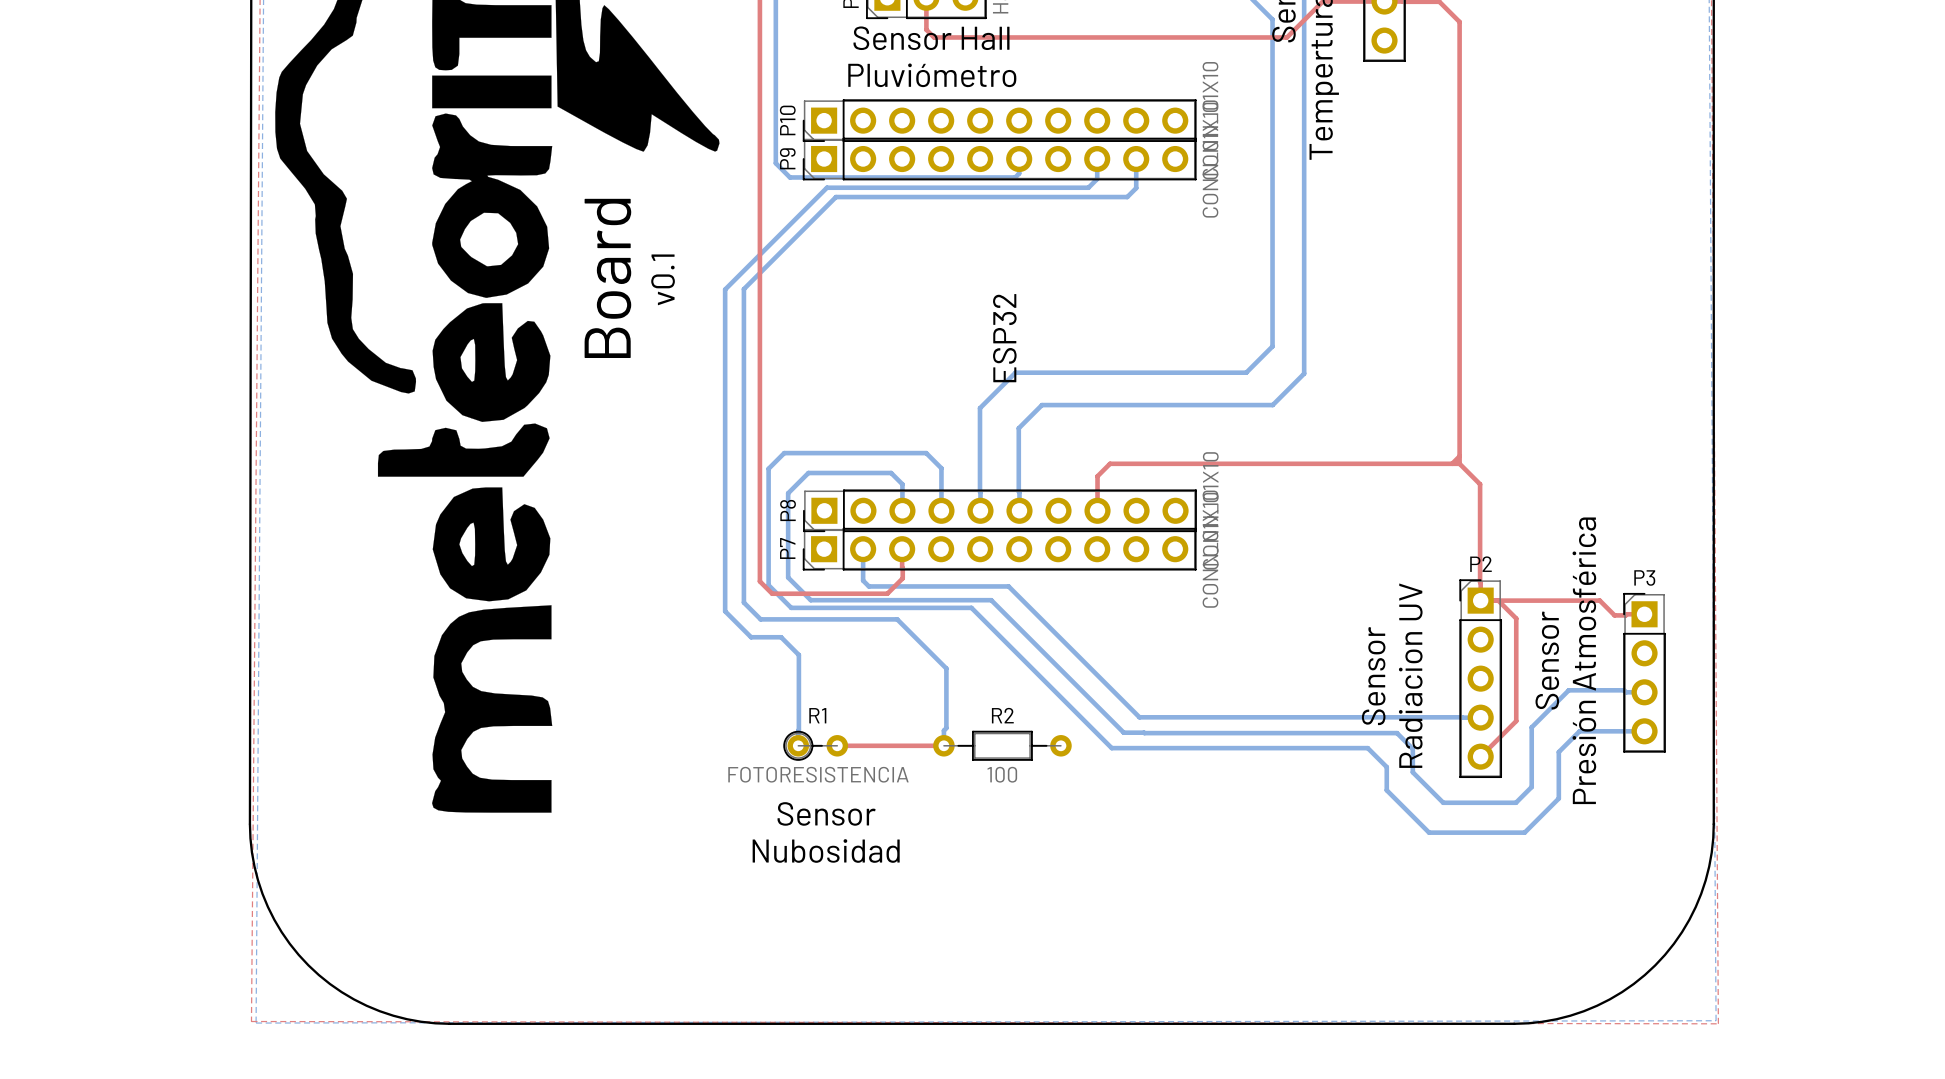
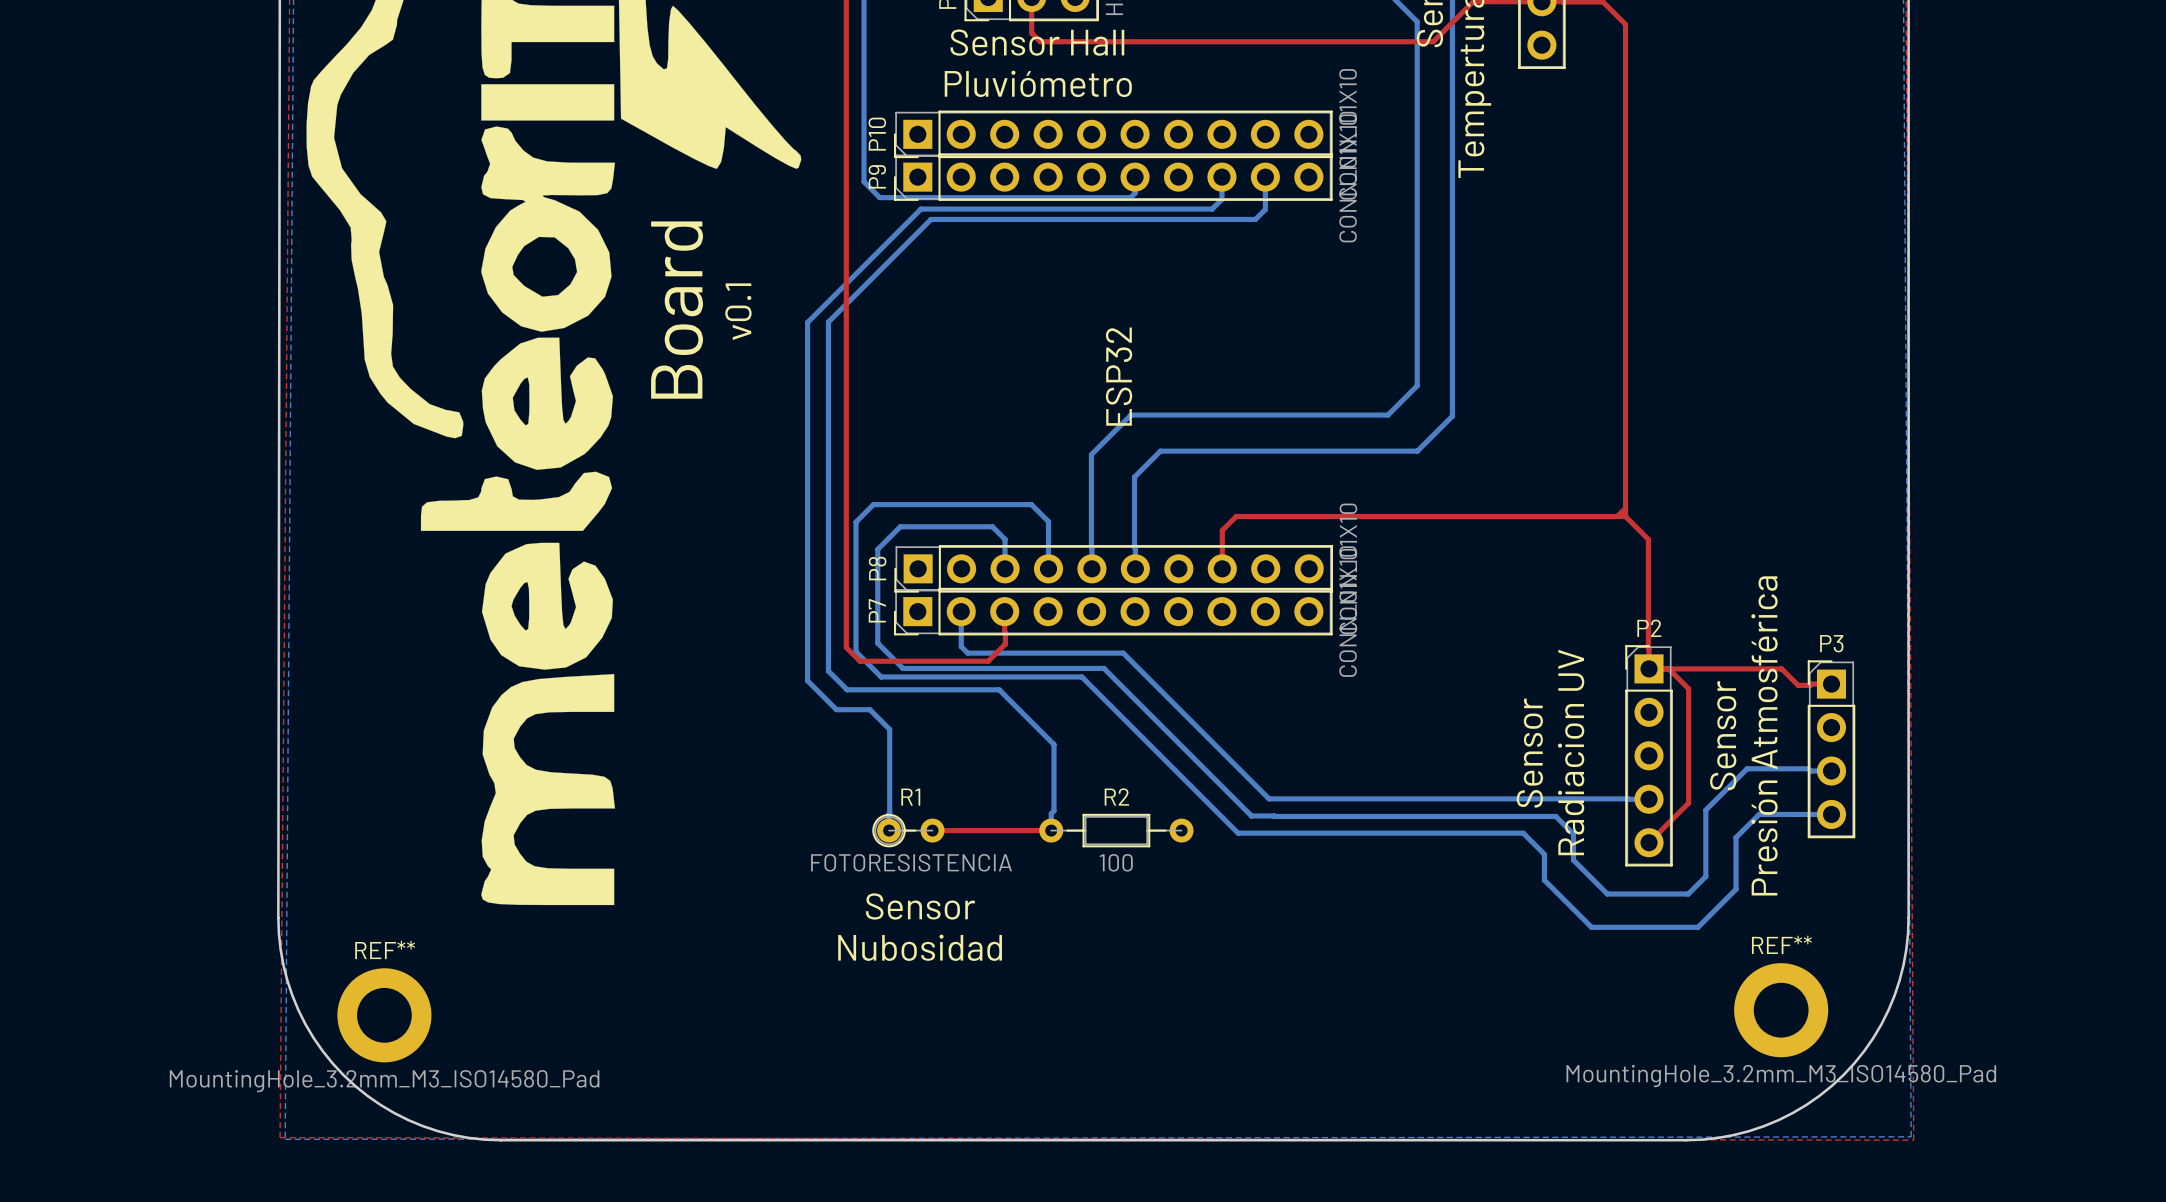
REF**: none -> MountingHole_3.2mm_M3_ISO14580_Pad (1781, 1010)
REF**: none -> MountingHole_3.2mm_M3_ISO14580_Pad (384, 1015)

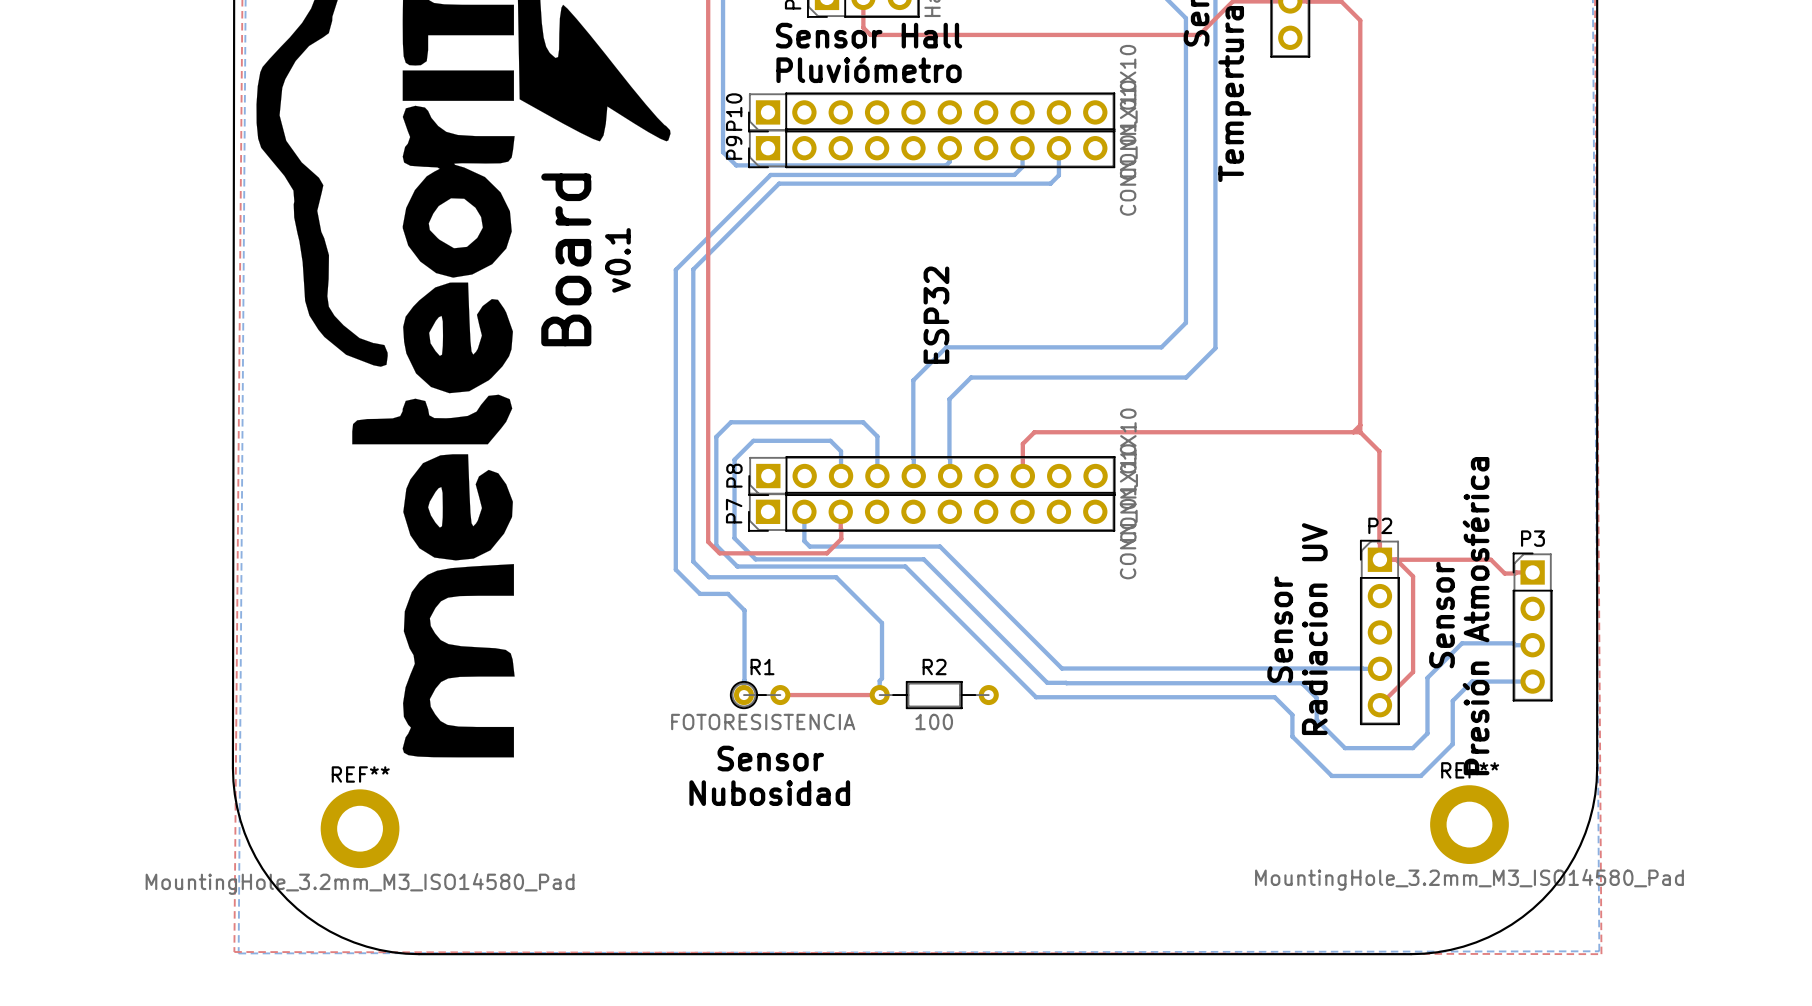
REF** position: (1781, 1010) -> (1469, 824)
REF** position: (384, 1015) -> (360, 828)

